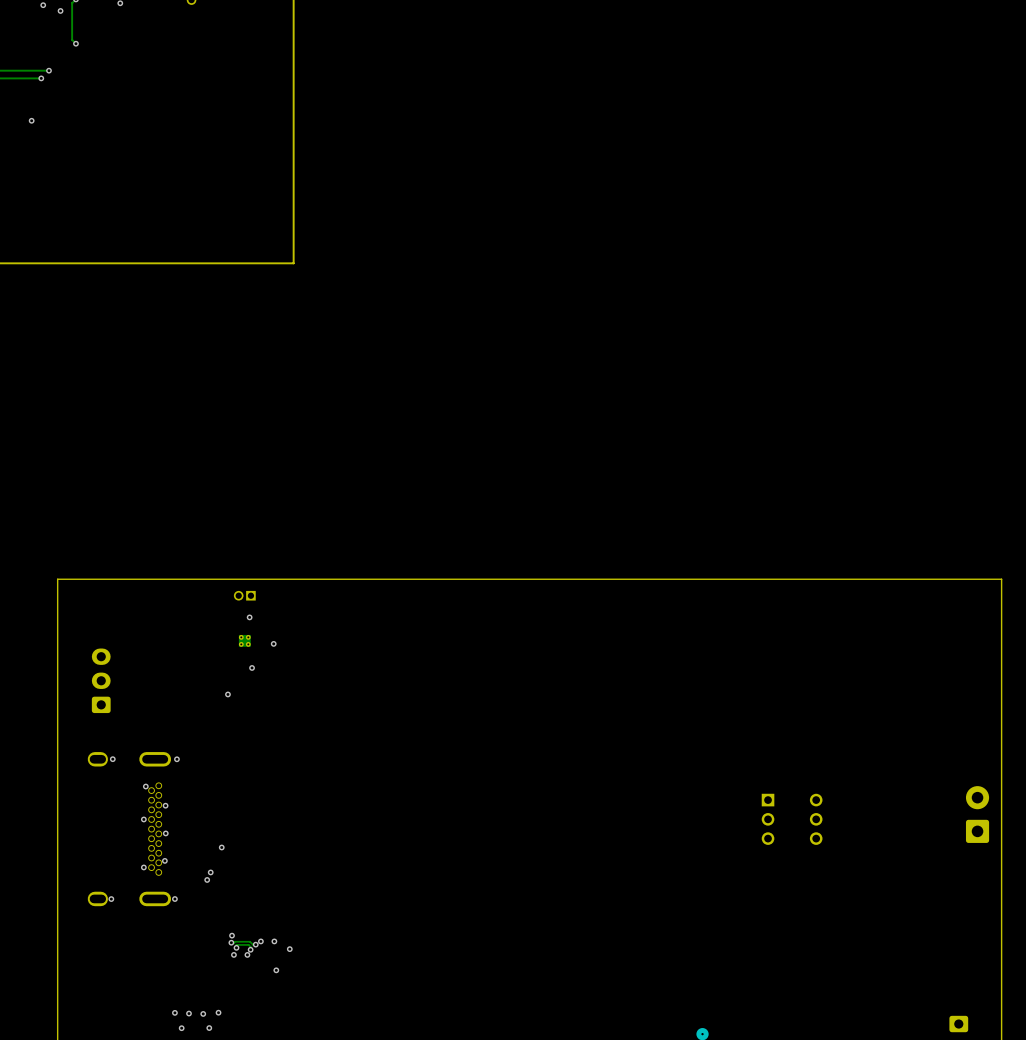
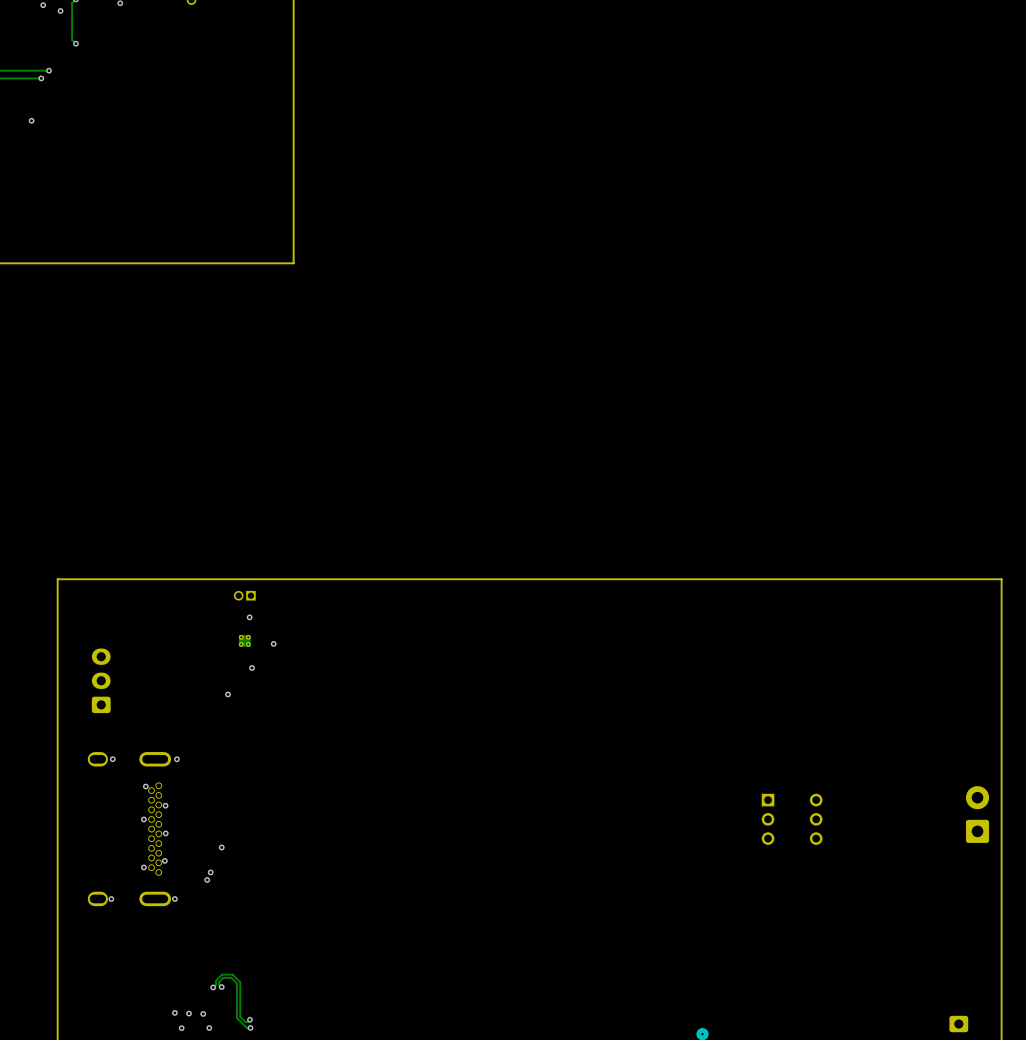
via: (232, 935) -> none
via: (260, 941) -> none
via: (274, 941) -> none
track: (231, 942) (250, 941) (255, 944) -> none
via: (231, 942) -> none
via: (255, 944) -> none
track: (236, 947) (236, 944) (248, 944) (250, 949) -> none
via: (236, 947) -> none
via: (250, 949) -> none
via: (289, 949) -> none
via: (233, 954) -> none
via: (247, 954) -> none
via: (276, 970) -> none
track: none -> (213, 987) (216, 984) (216, 980) (222, 974) (232, 974) (240, 982) (240, 1016) (245, 1021) (249, 1019)
via: none -> (213, 987)
track: none -> (221, 987) (219, 982) (223, 977) (231, 977) (237, 983) (237, 1018) (246, 1027) (250, 1027)
via: none -> (221, 987)
via: (218, 1012) -> none
via: none -> (249, 1019)
via: none -> (250, 1027)

